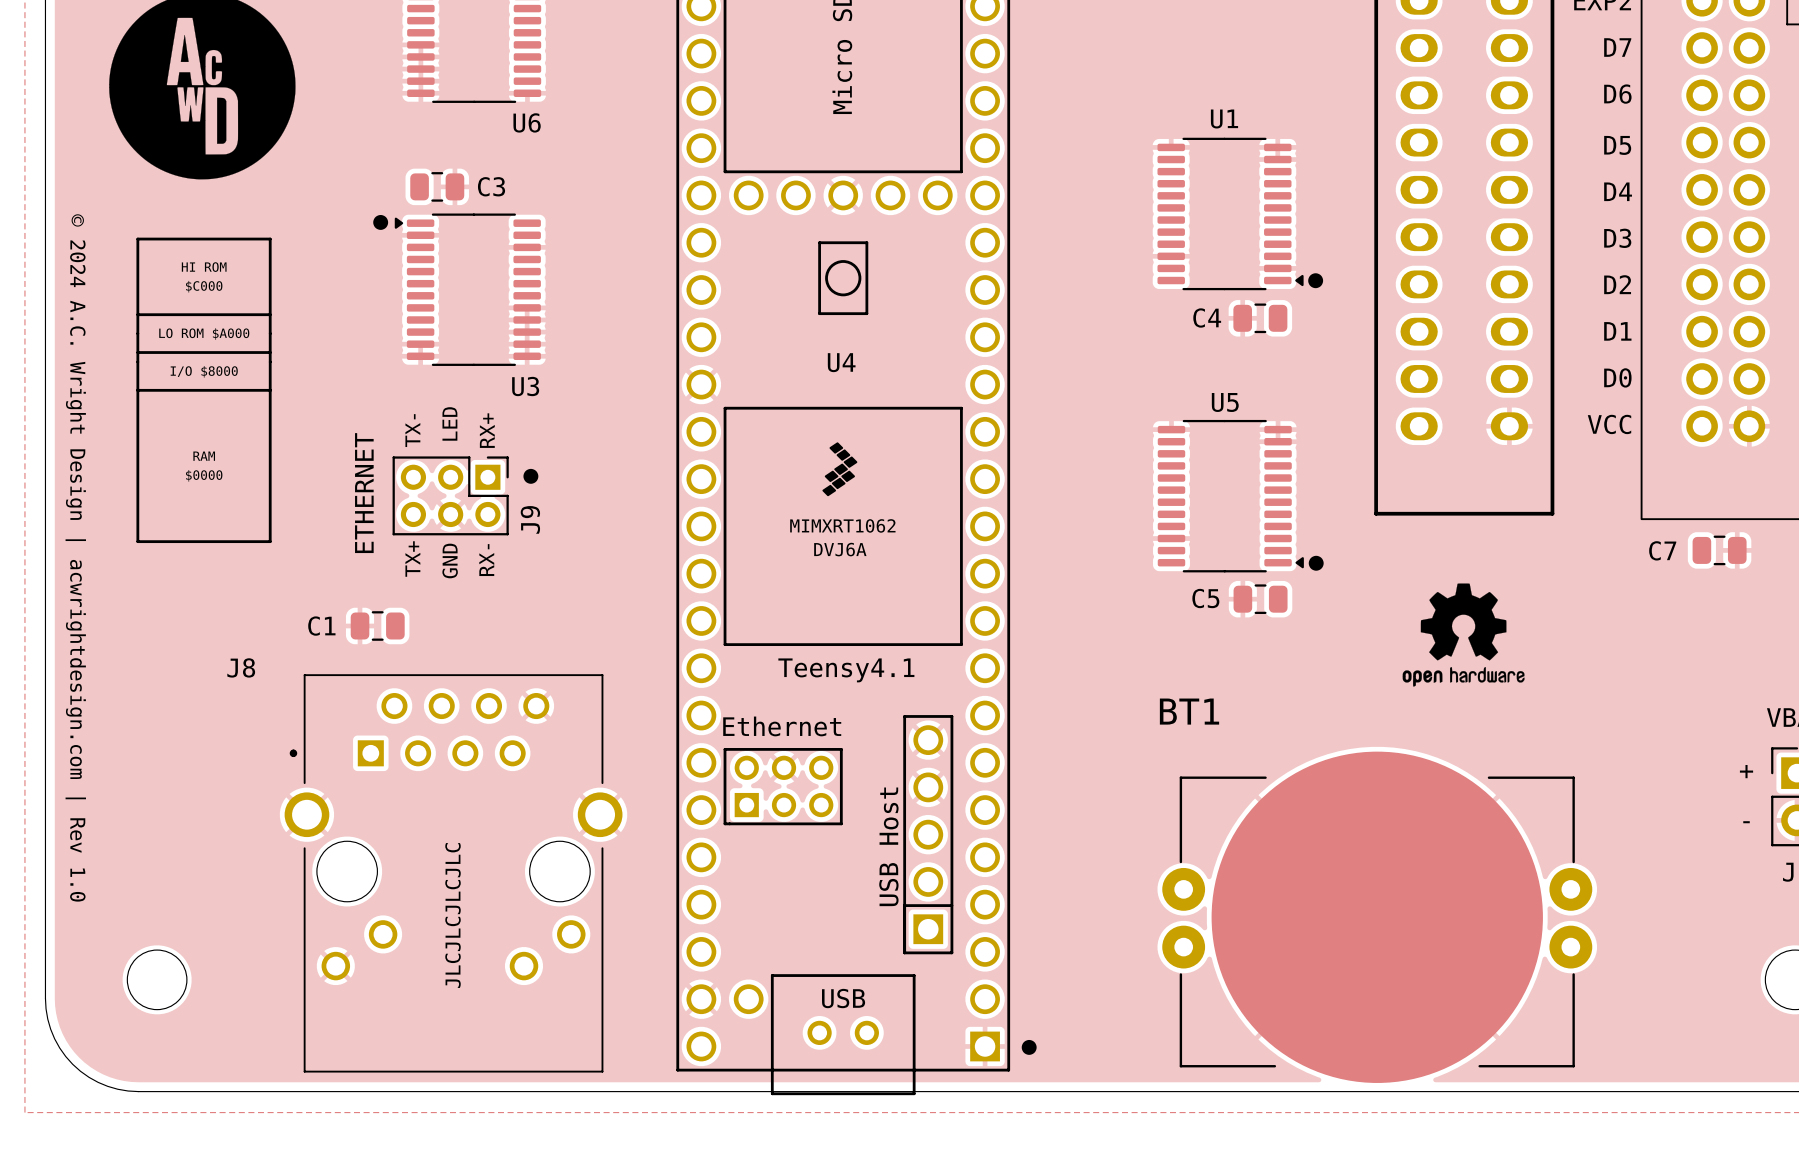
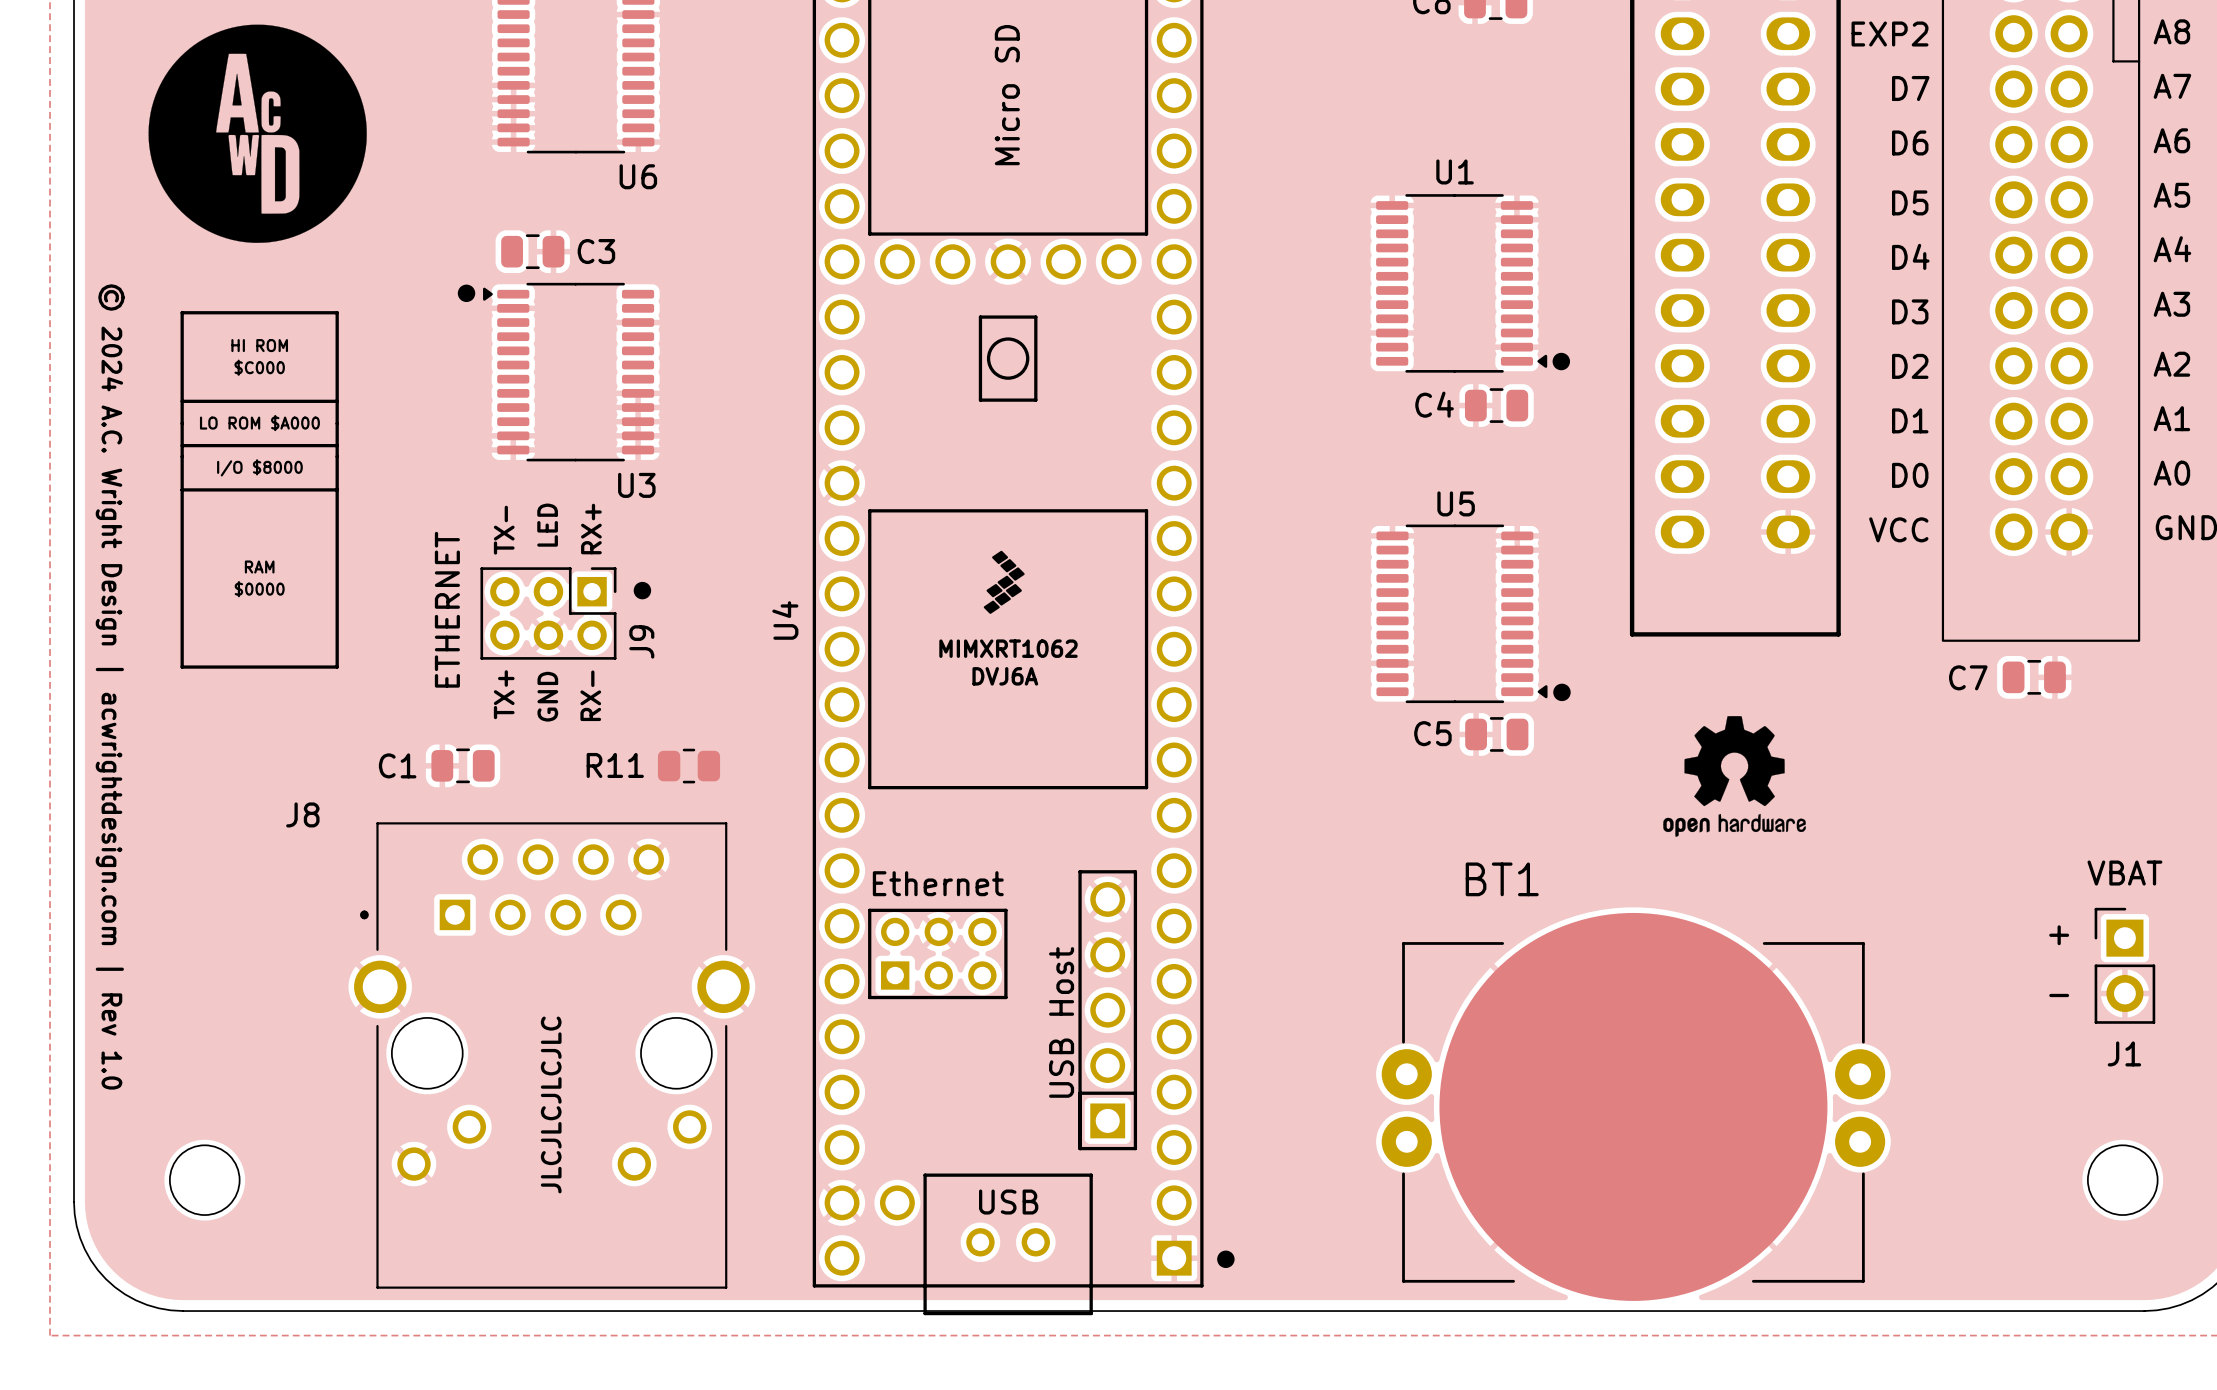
U4 name rotation: 0° (841, 362) -> 90° counterclockwise (785, 620)
U4 name position: U4 (841, 362) -> U4 (785, 620)
R11: none -> (688, 766)
U4 value: Teensy4.1 (846, 670) -> none
BT1 name position: BT1 (1189, 711) -> BT1 (1502, 879)

